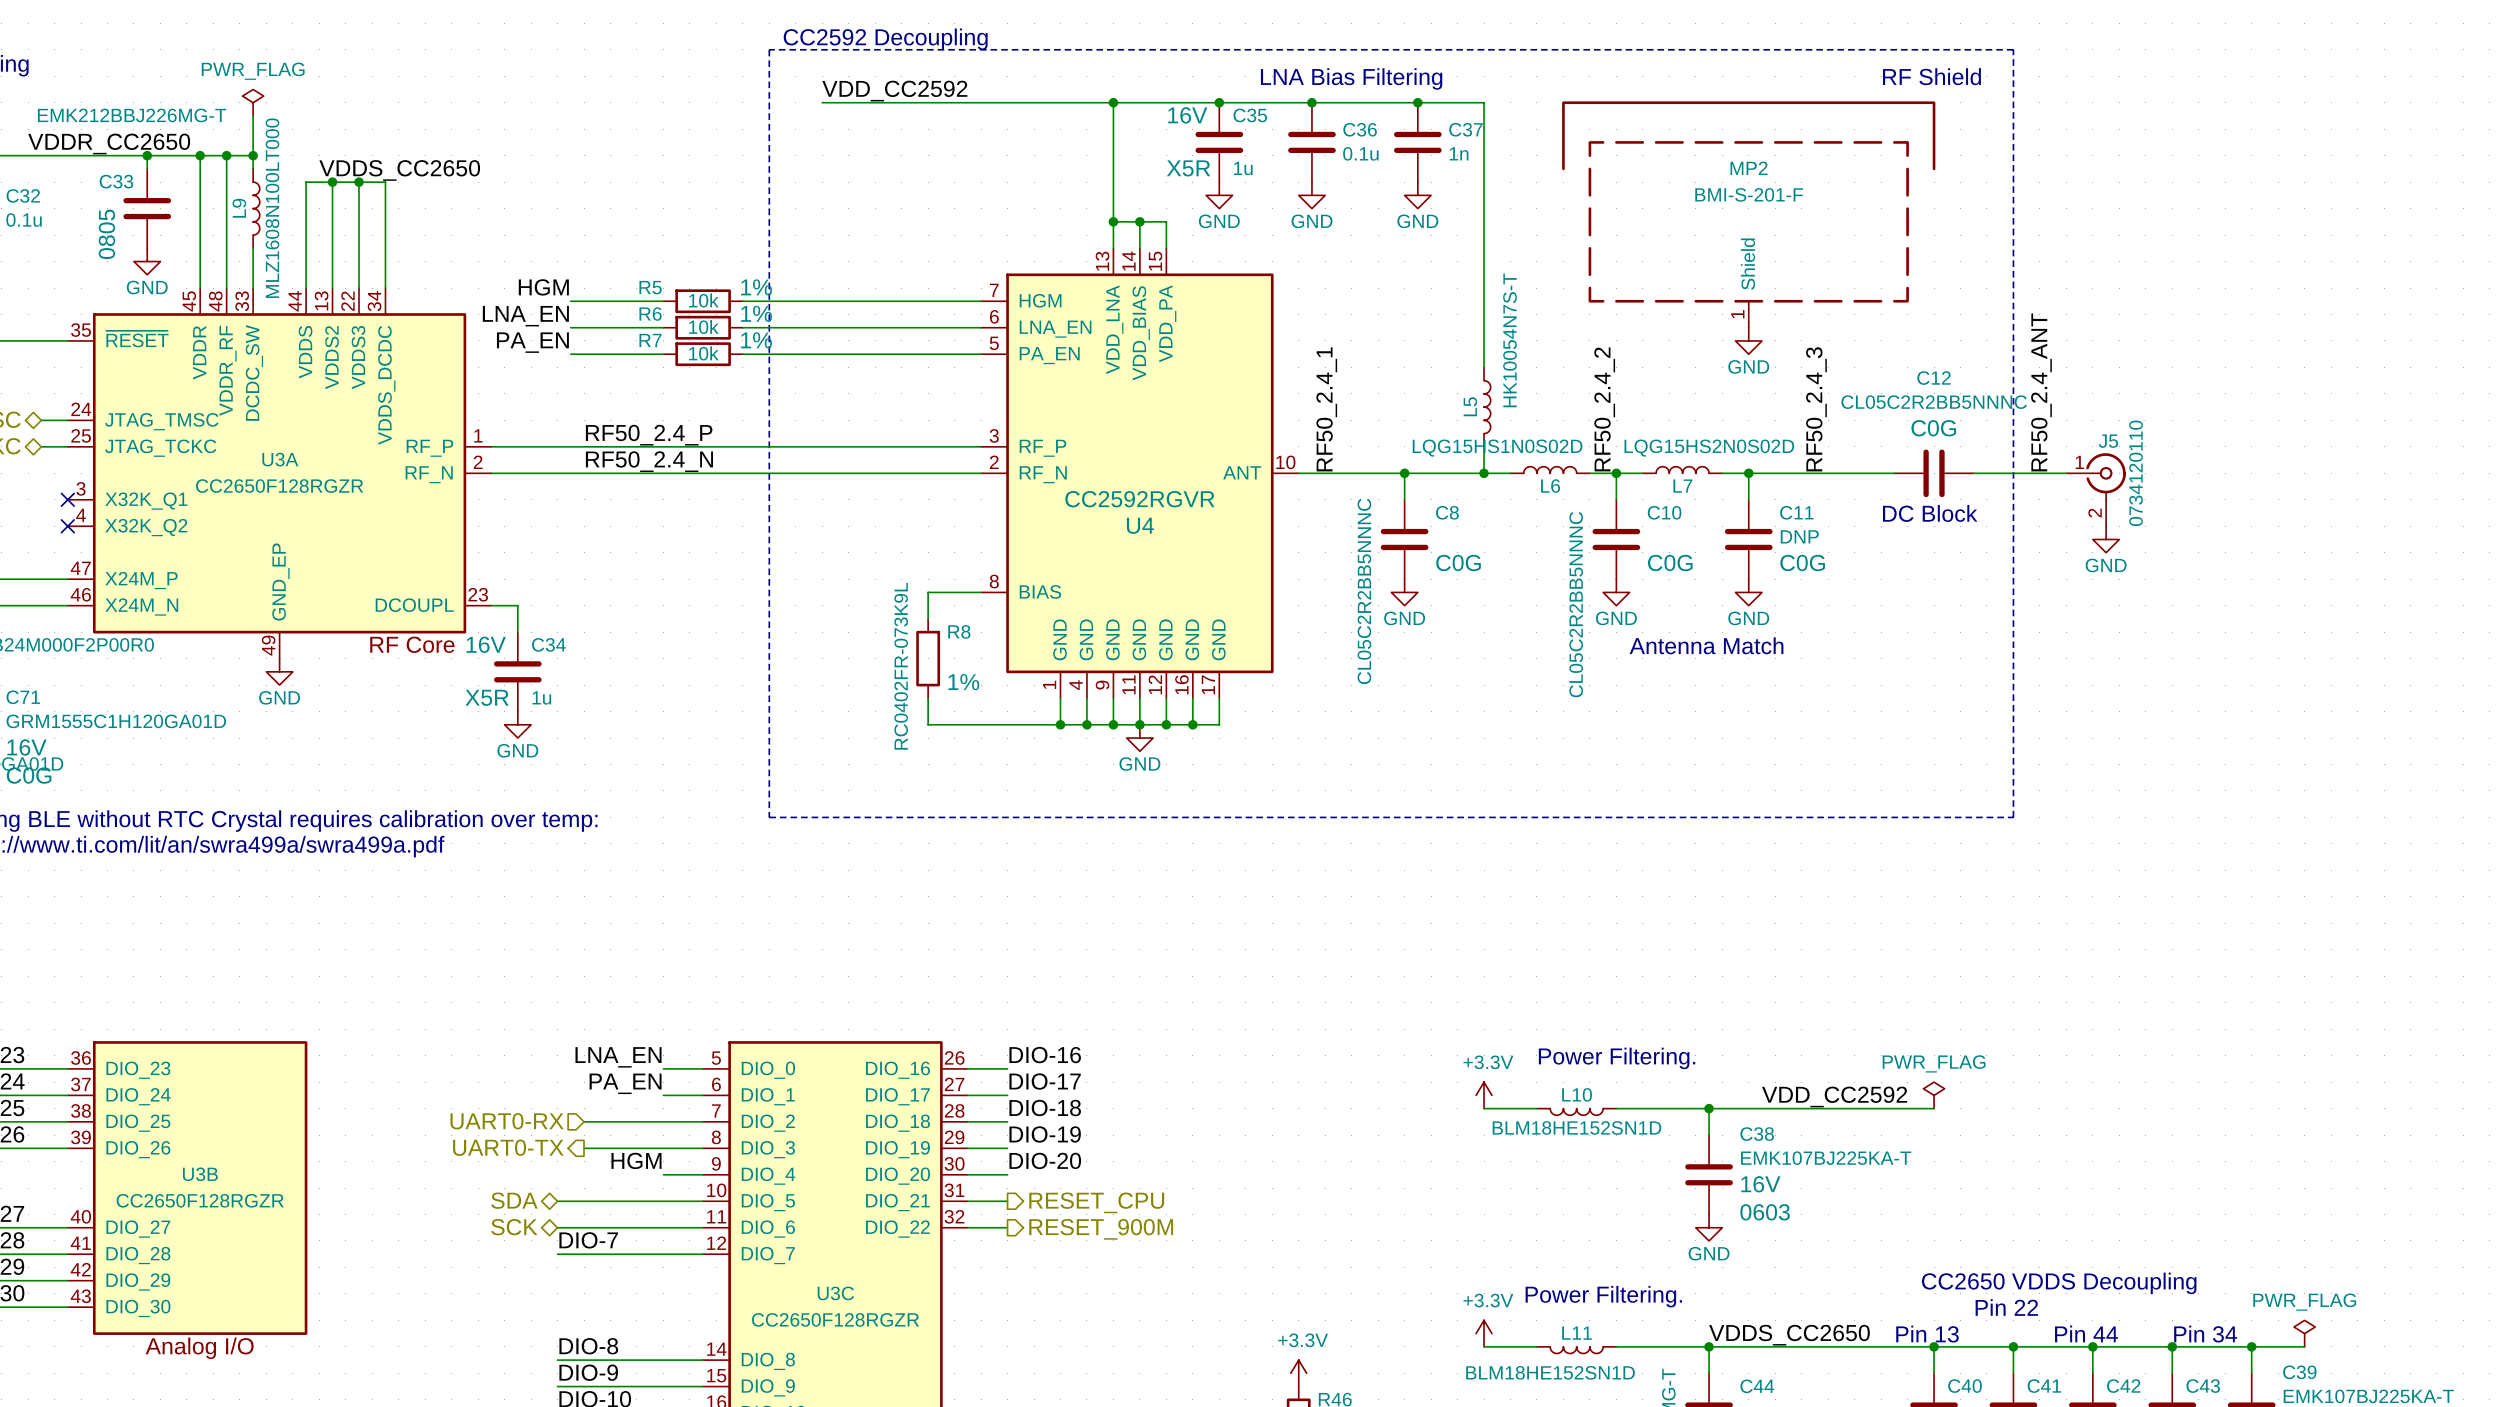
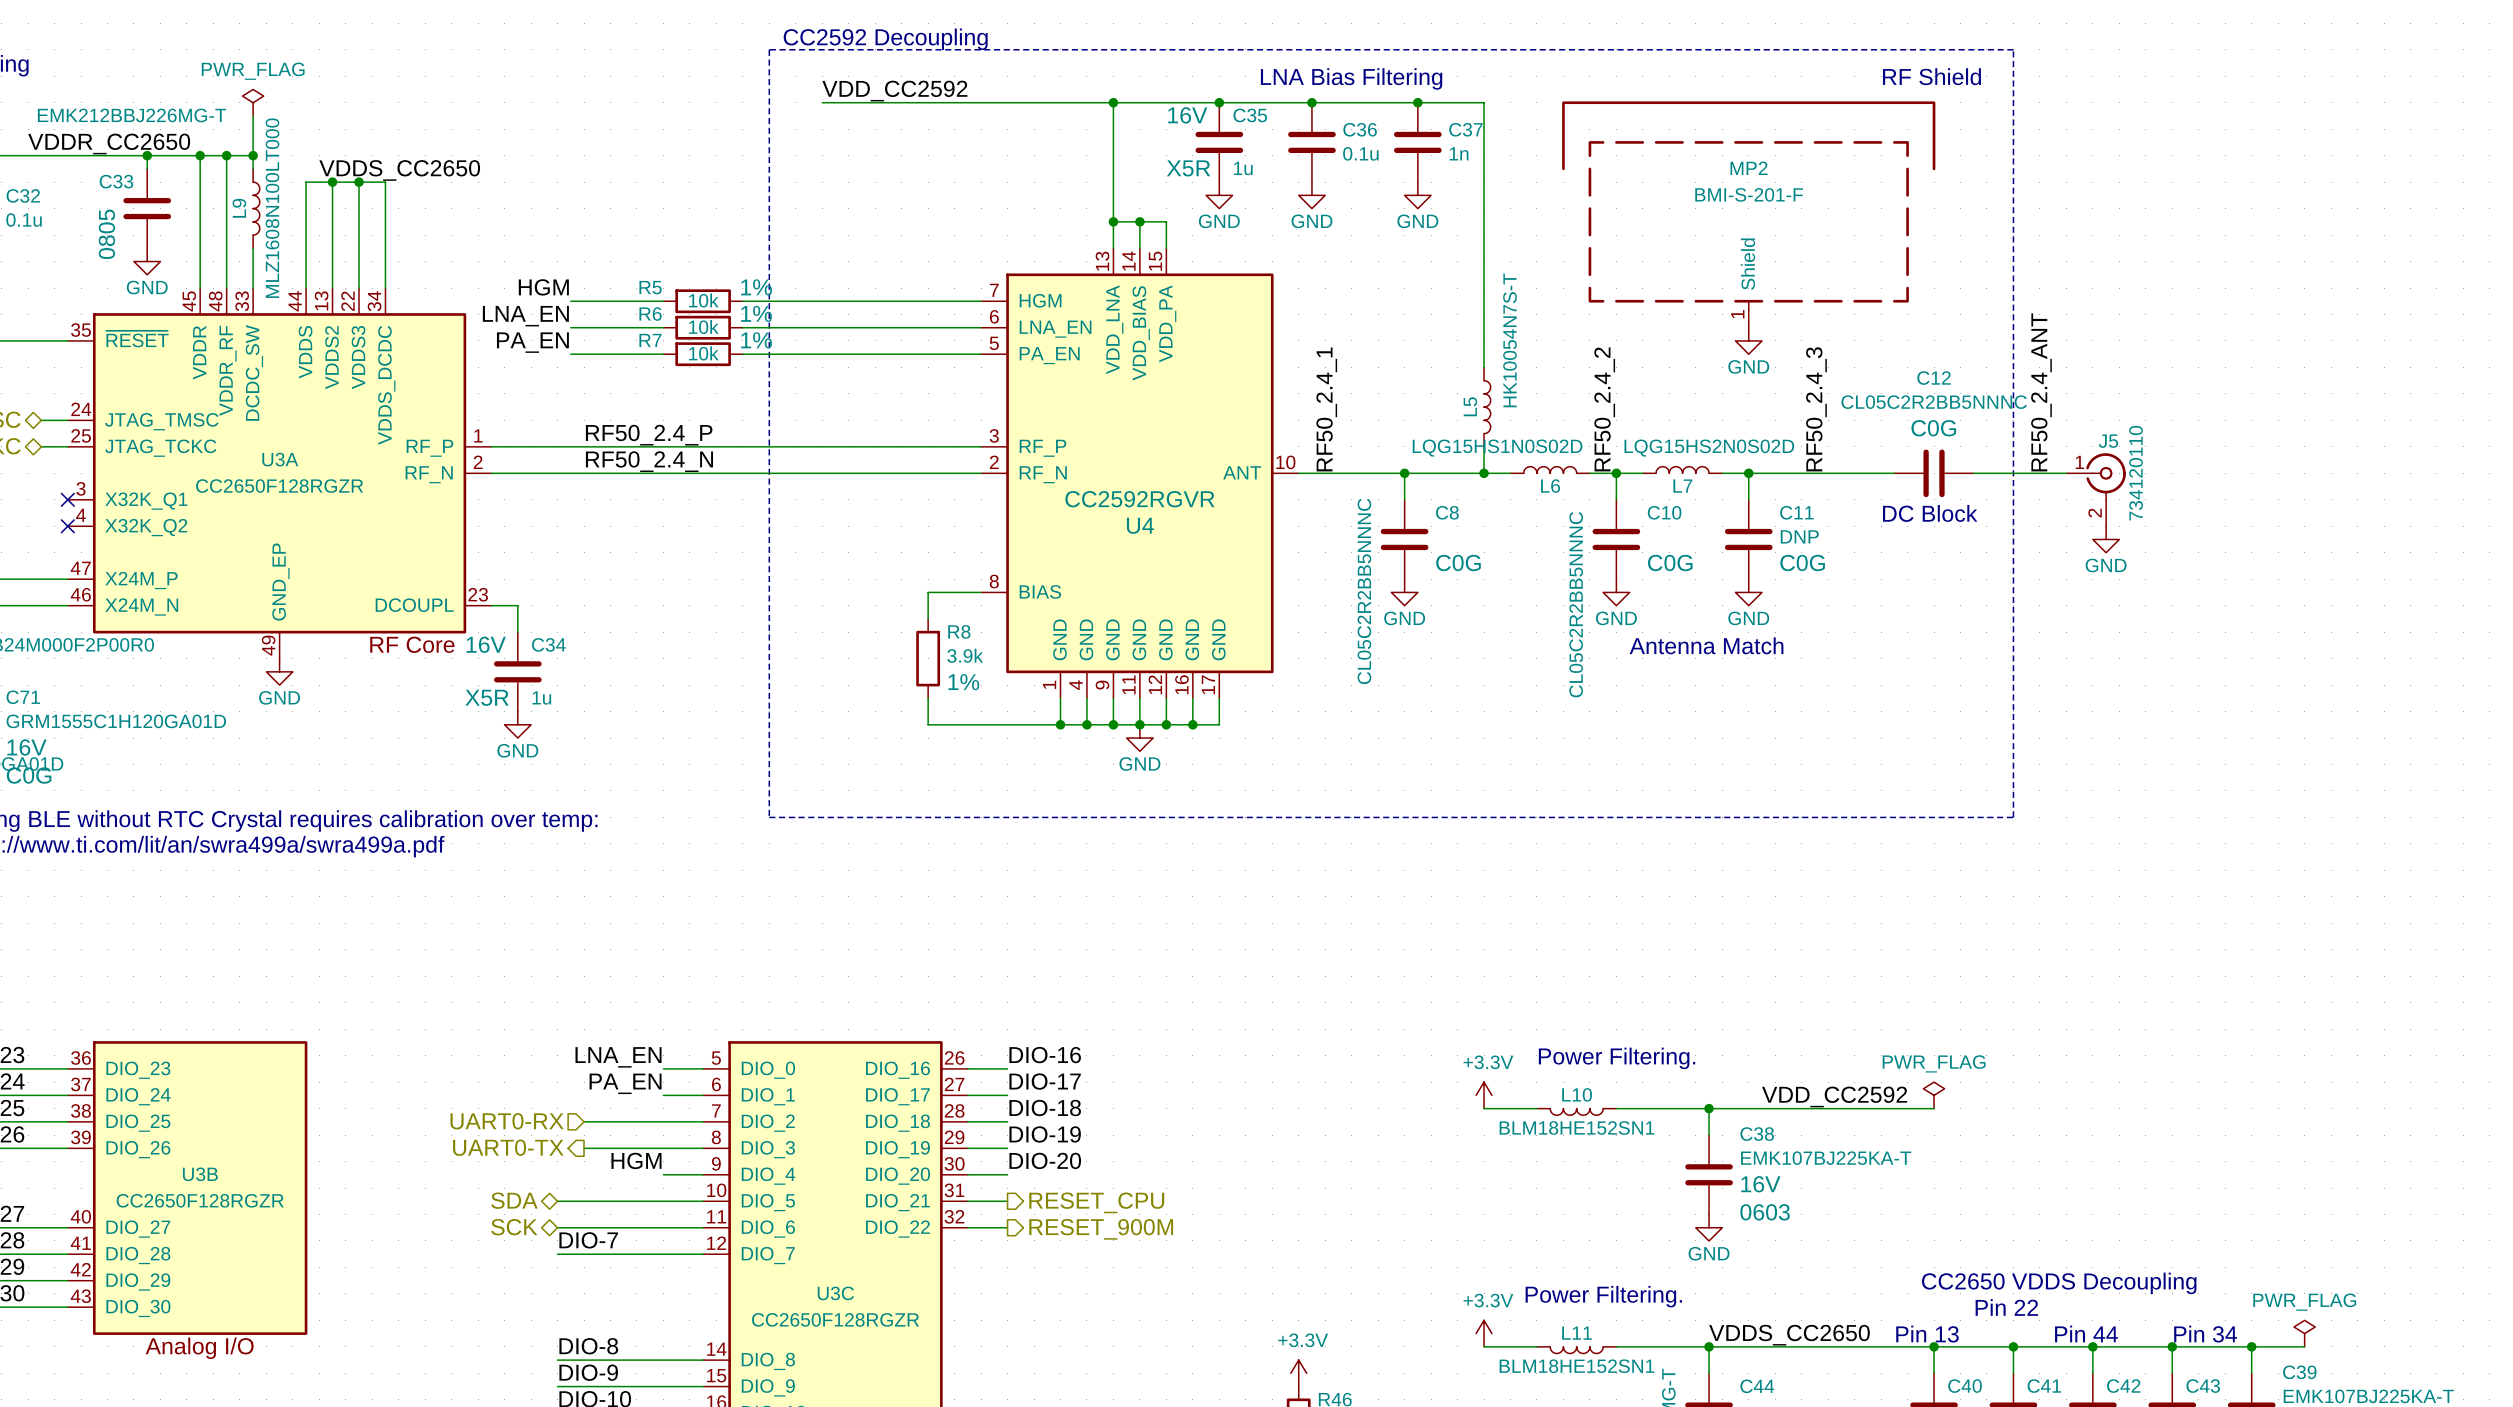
J5 value: 0734120110 (2136, 473) -> 734120110 (2136, 473)
R8 value: RC0402FR-073K9L (901, 666) -> 3.9k (965, 655)
L10 value: BLM18HE152SN1D (1577, 1127) -> BLM18HE152SN1 (1576, 1127)
L11 value: BLM18HE152SN1D (1550, 1372) -> BLM18HE152SN1 (1576, 1366)

